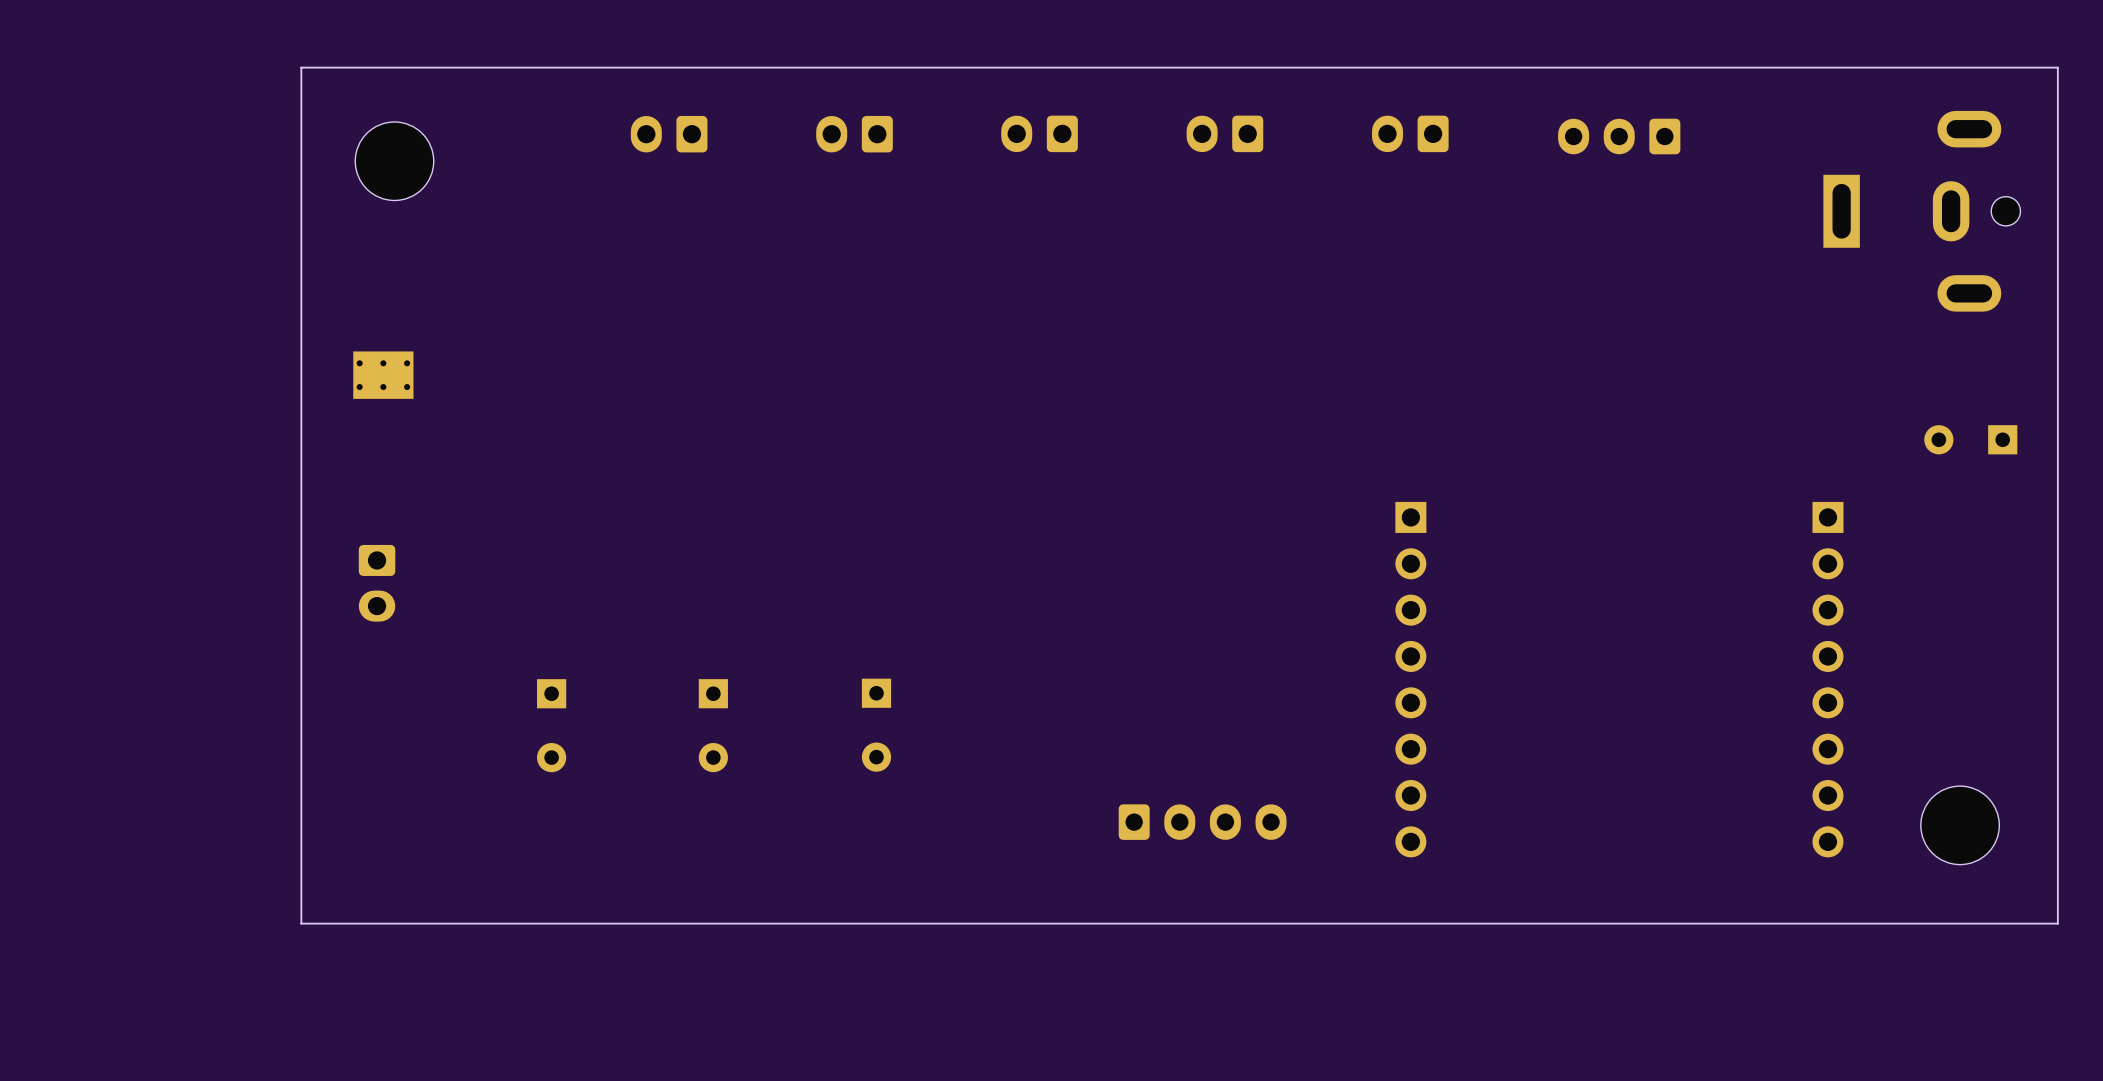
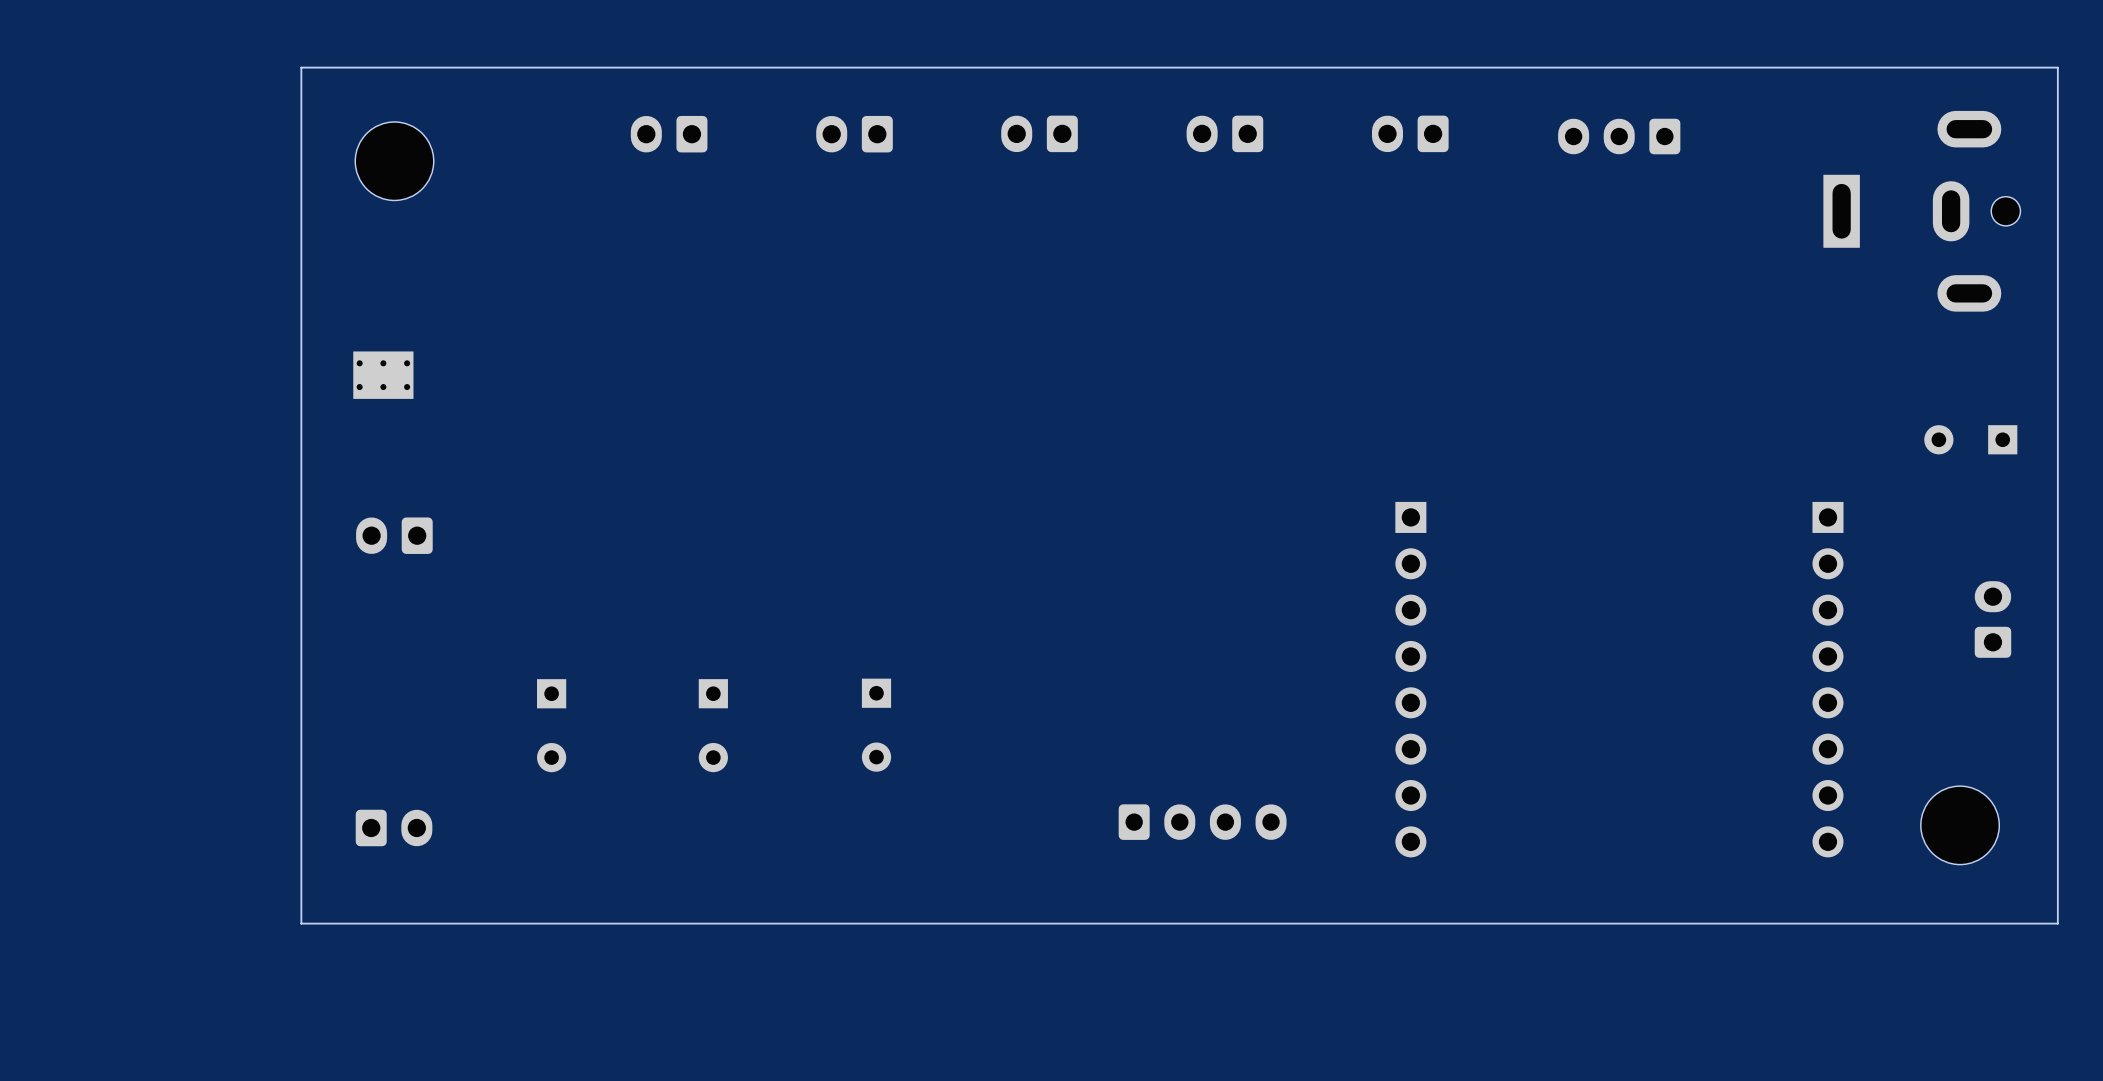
part rotation: 0° (377, 583) -> 90° clockwise (394, 535)
part position: (377, 583) -> (394, 535)
part: none -> (1992, 619)
part: none -> (394, 827)

